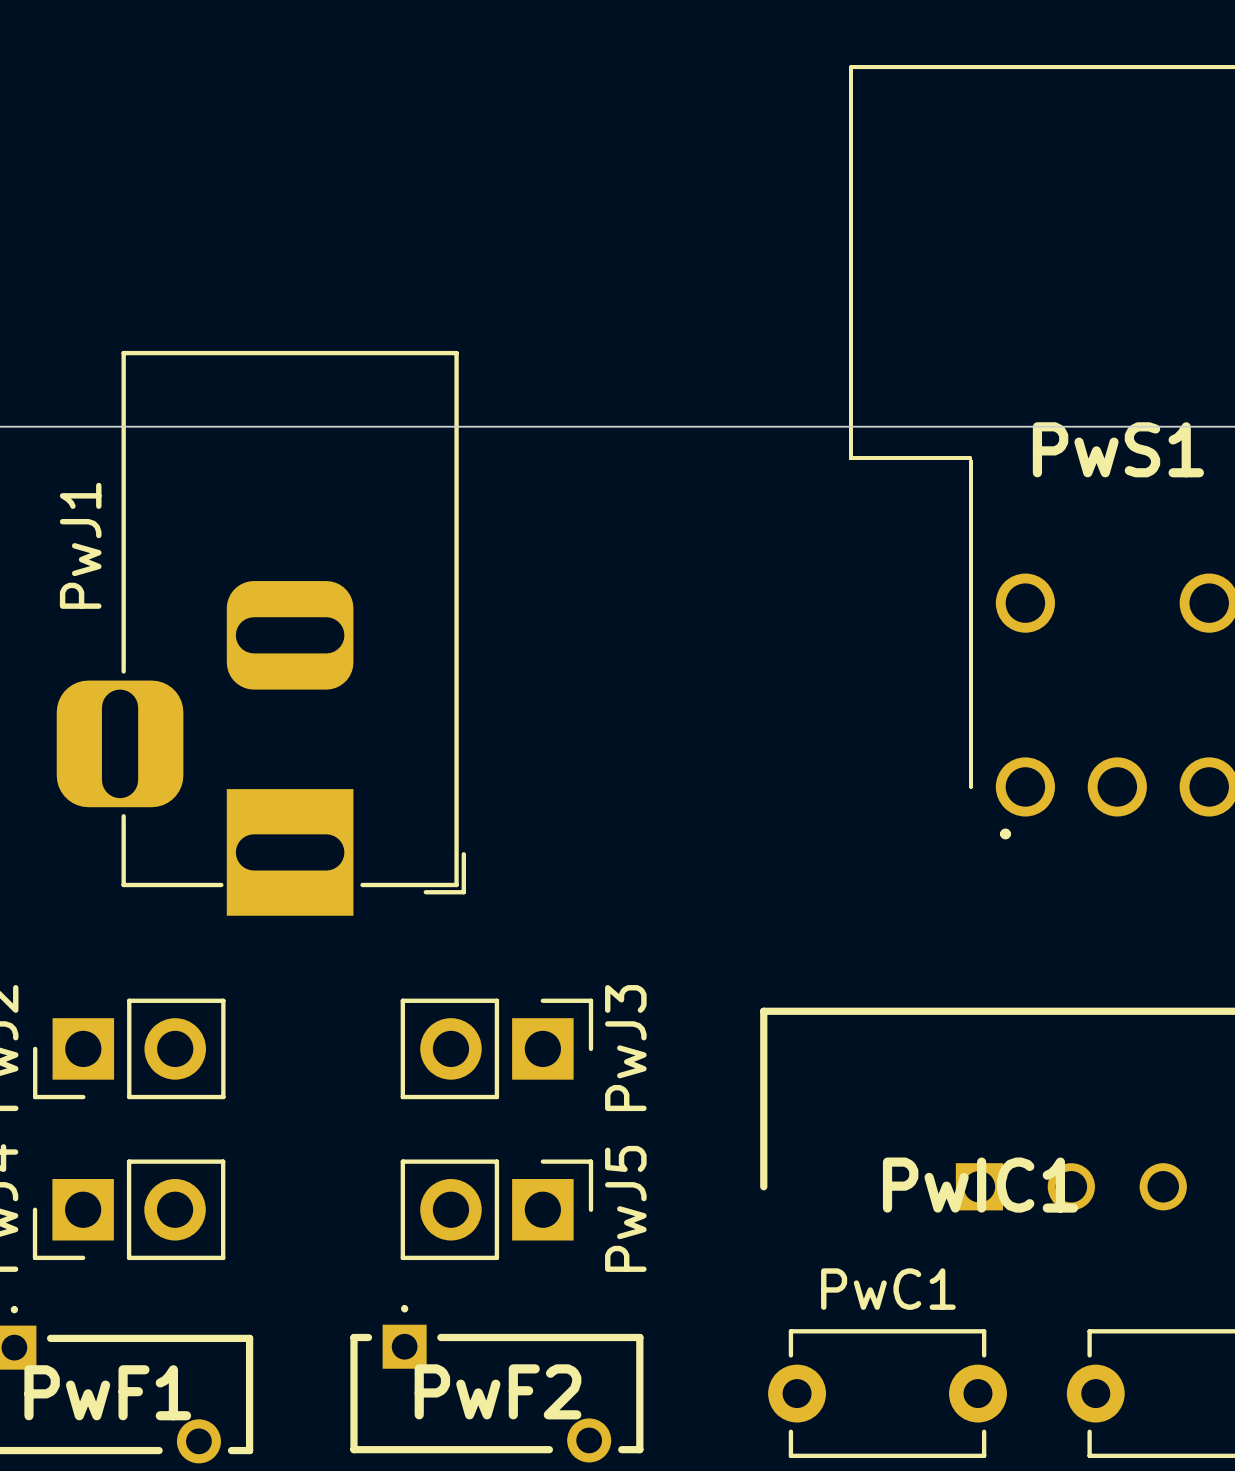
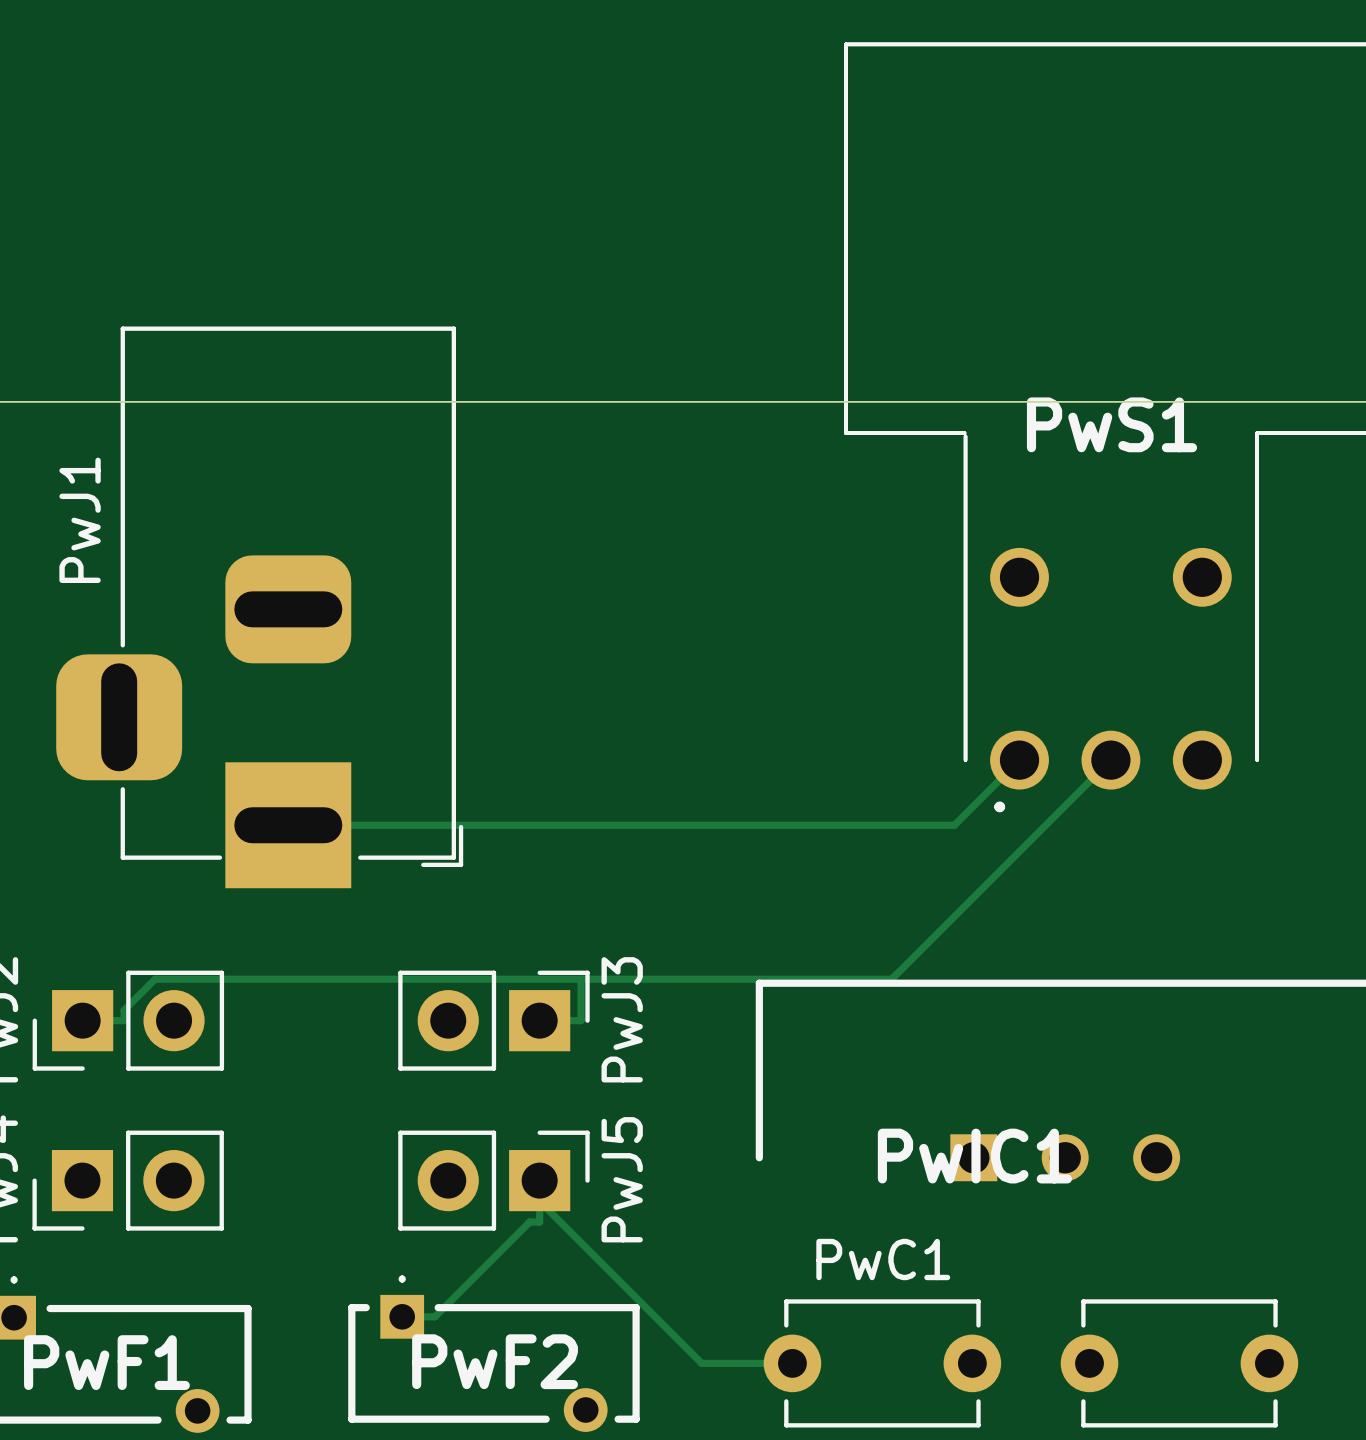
track: none -> (1019, 760) (954, 825) (288, 825)
track: none -> (1110, 760) (891, 979) (155, 979) (124, 1010) (124, 1020) (82, 1020)
track: none -> (582, 979) (581, 1020) (539, 1020)
track: none -> (539, 1180) (539, 1222) (529, 1222) (434, 1316) (402, 1316)
track: none -> (539, 1201) (701, 1363) (792, 1363)

